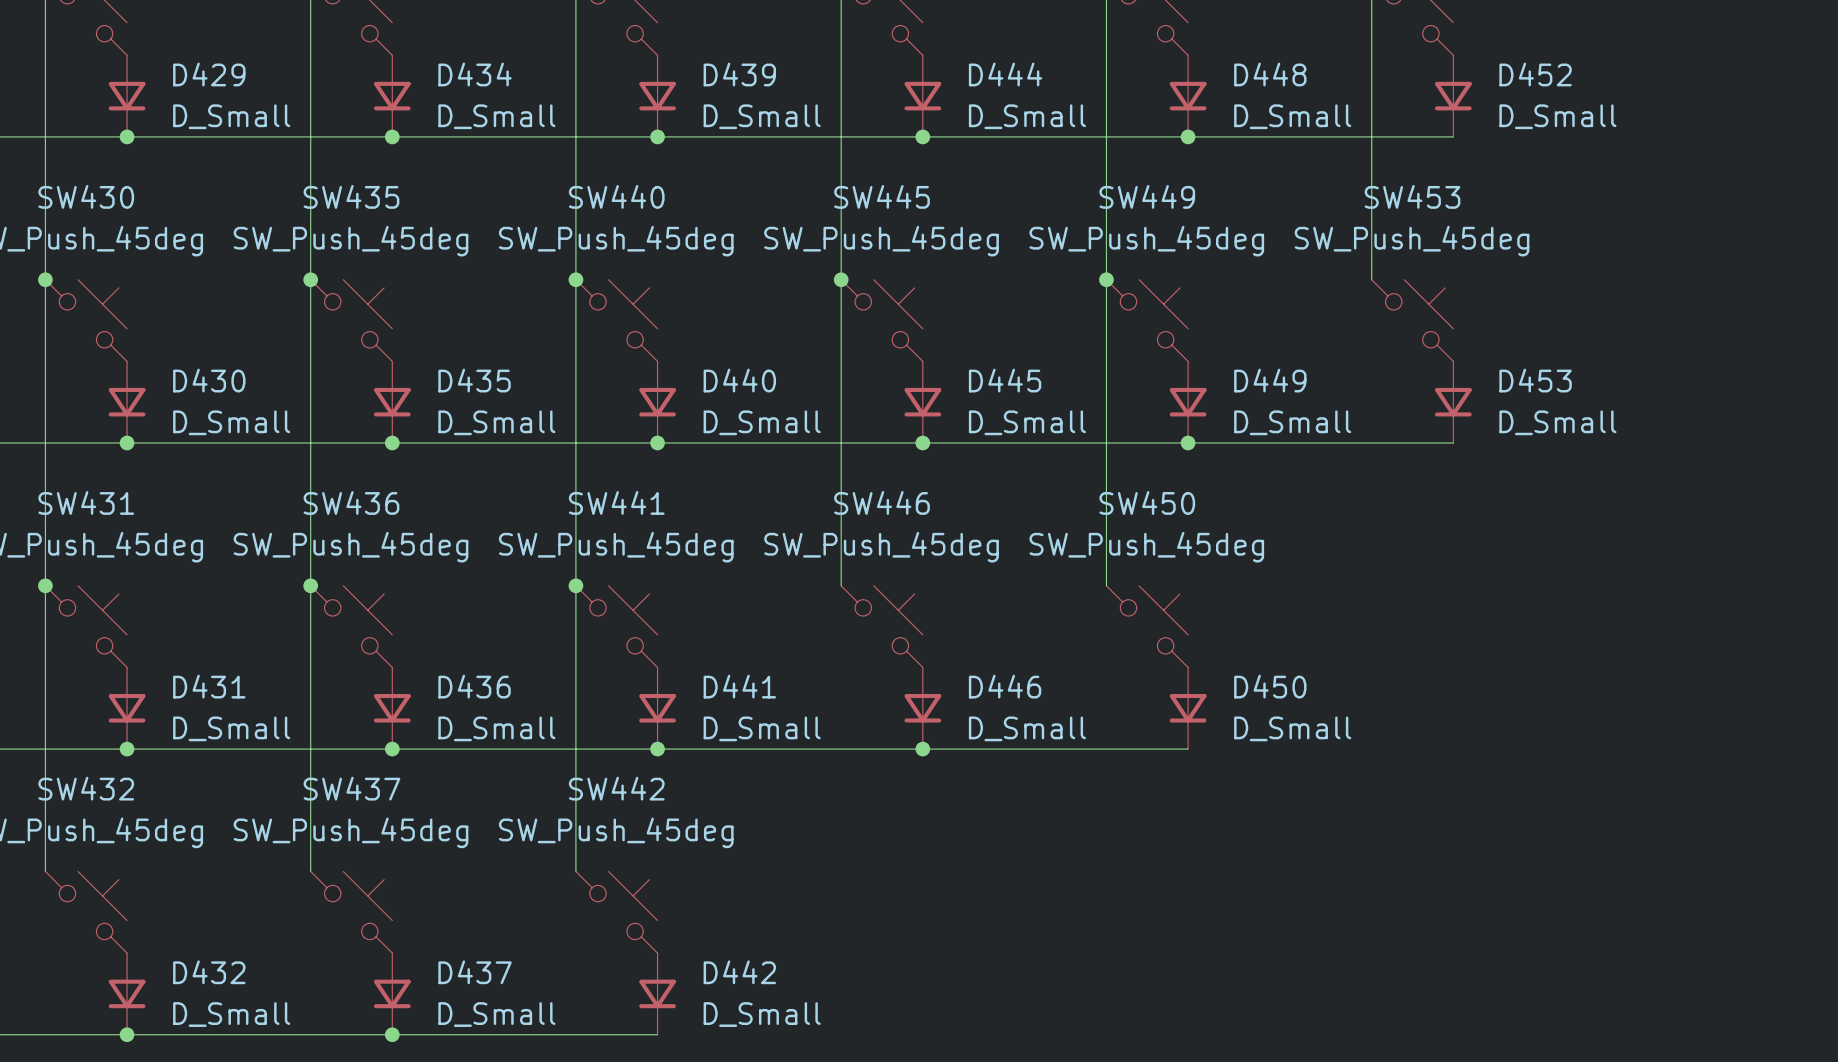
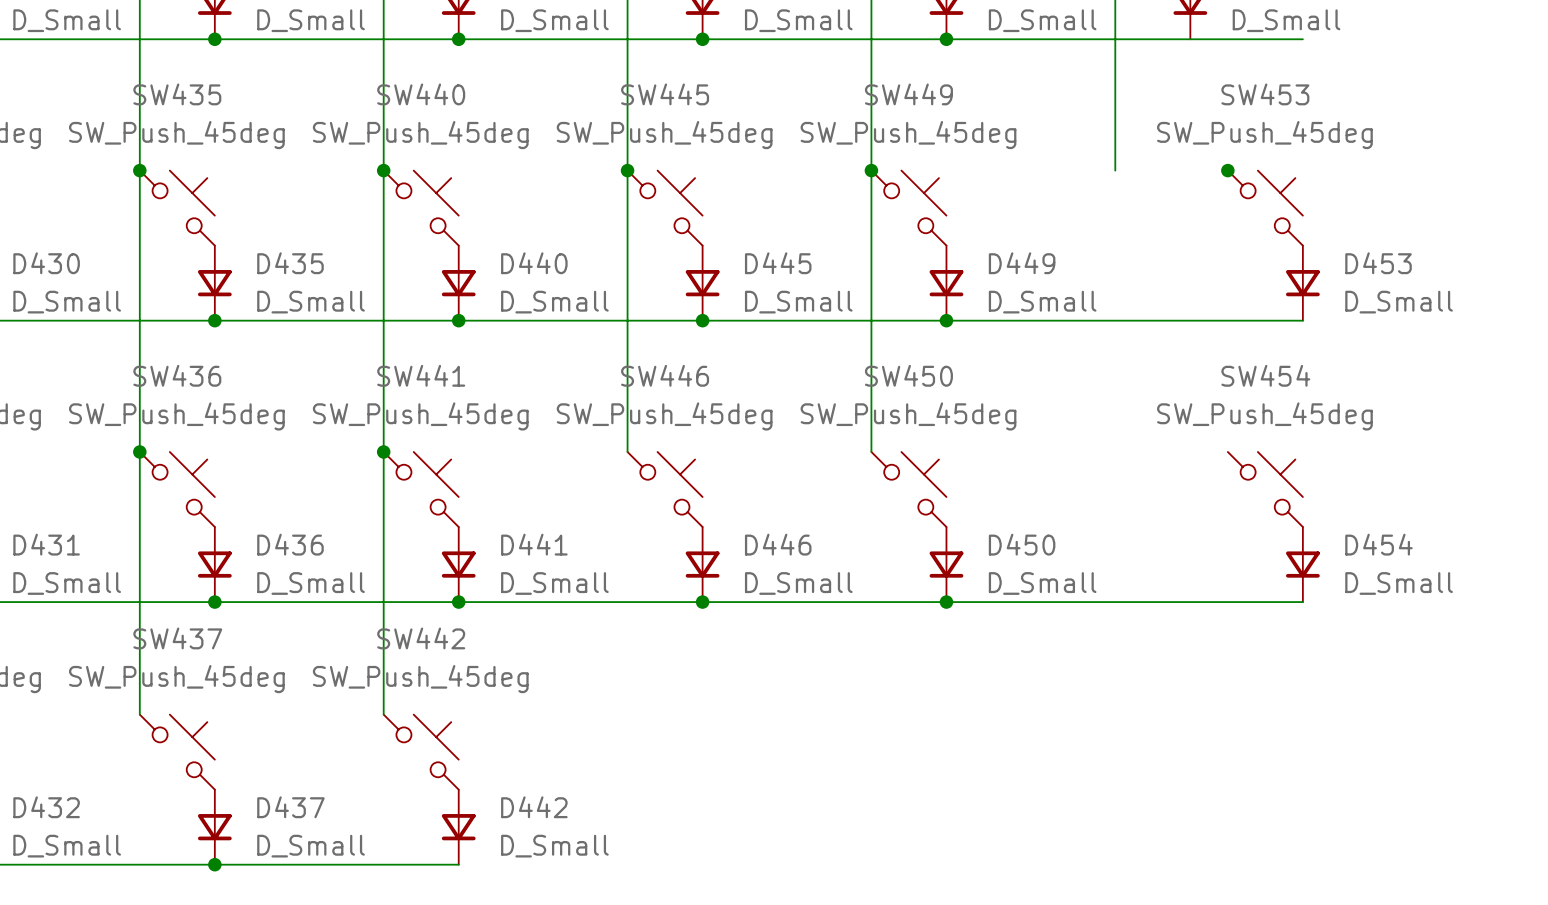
wire: none -> (1190, 39) (1302, 39)
junction: none -> (1227, 170)
SW453 position: (1412, 320) -> (1265, 208)
D453 position: (1453, 402) -> (1302, 283)
wire: none -> (1190, 320) (1302, 320)
SW454: none -> SW_Push_45deg (1265, 489)
D454: none -> D_Small (1302, 564)
wire: none -> (946, 602) (1302, 602)
junction: none -> (946, 602)

